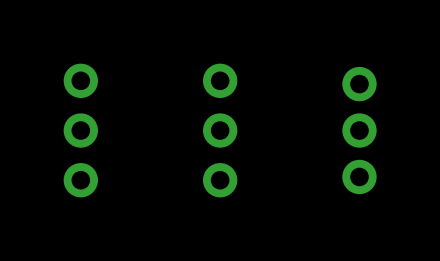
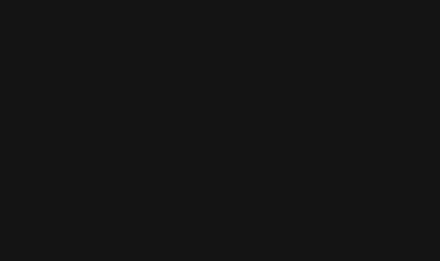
part: (80, 130) -> none
part: (220, 130) -> none
part: (359, 130) -> none

